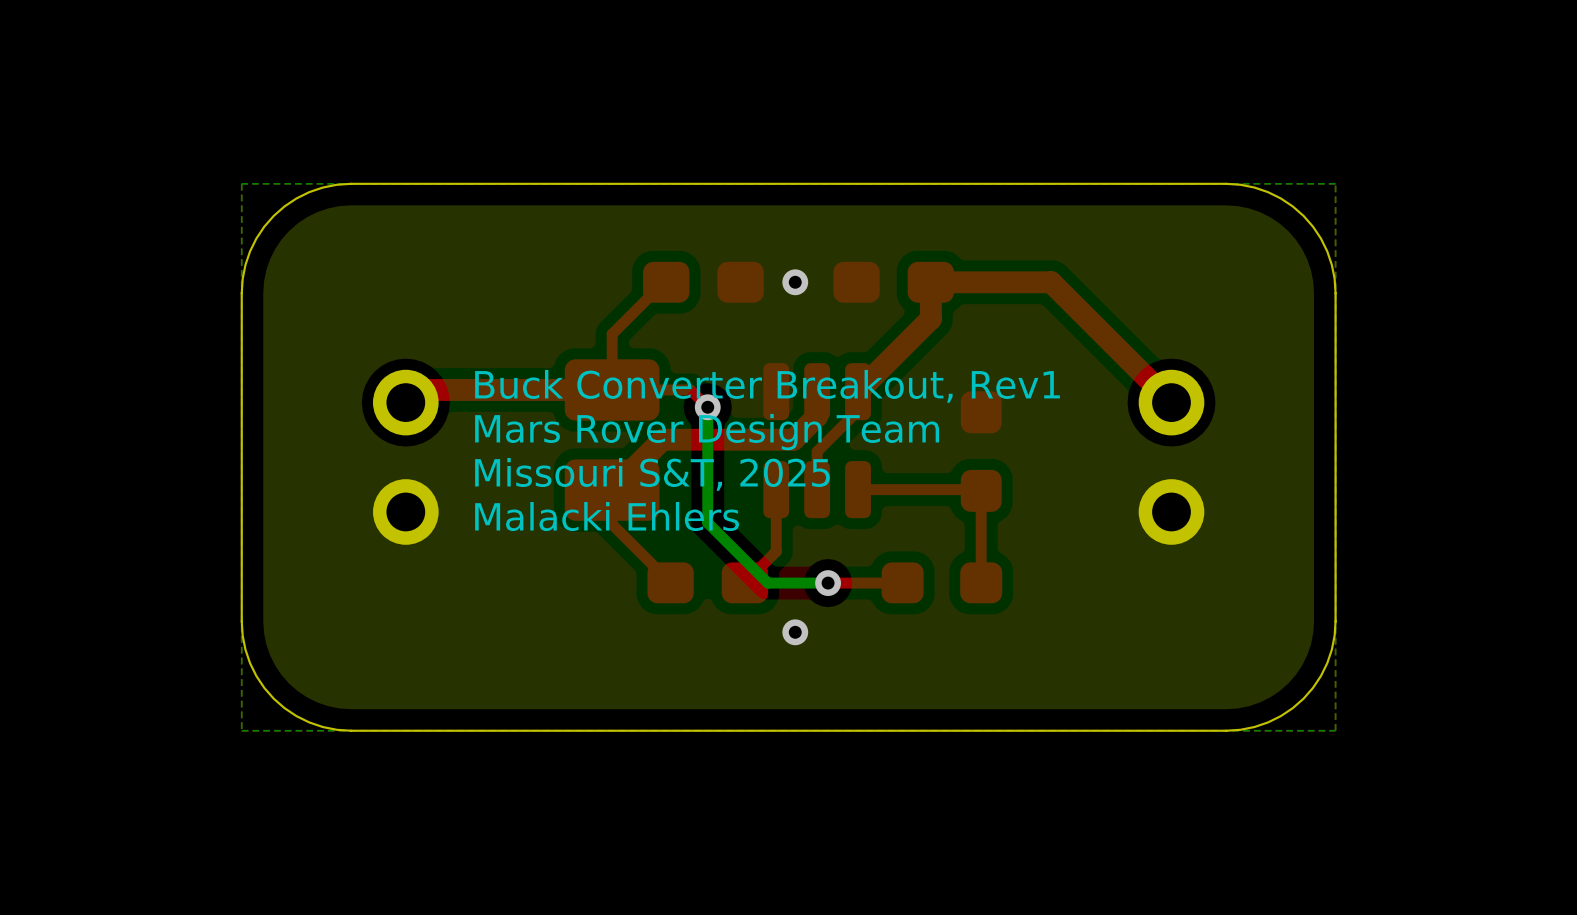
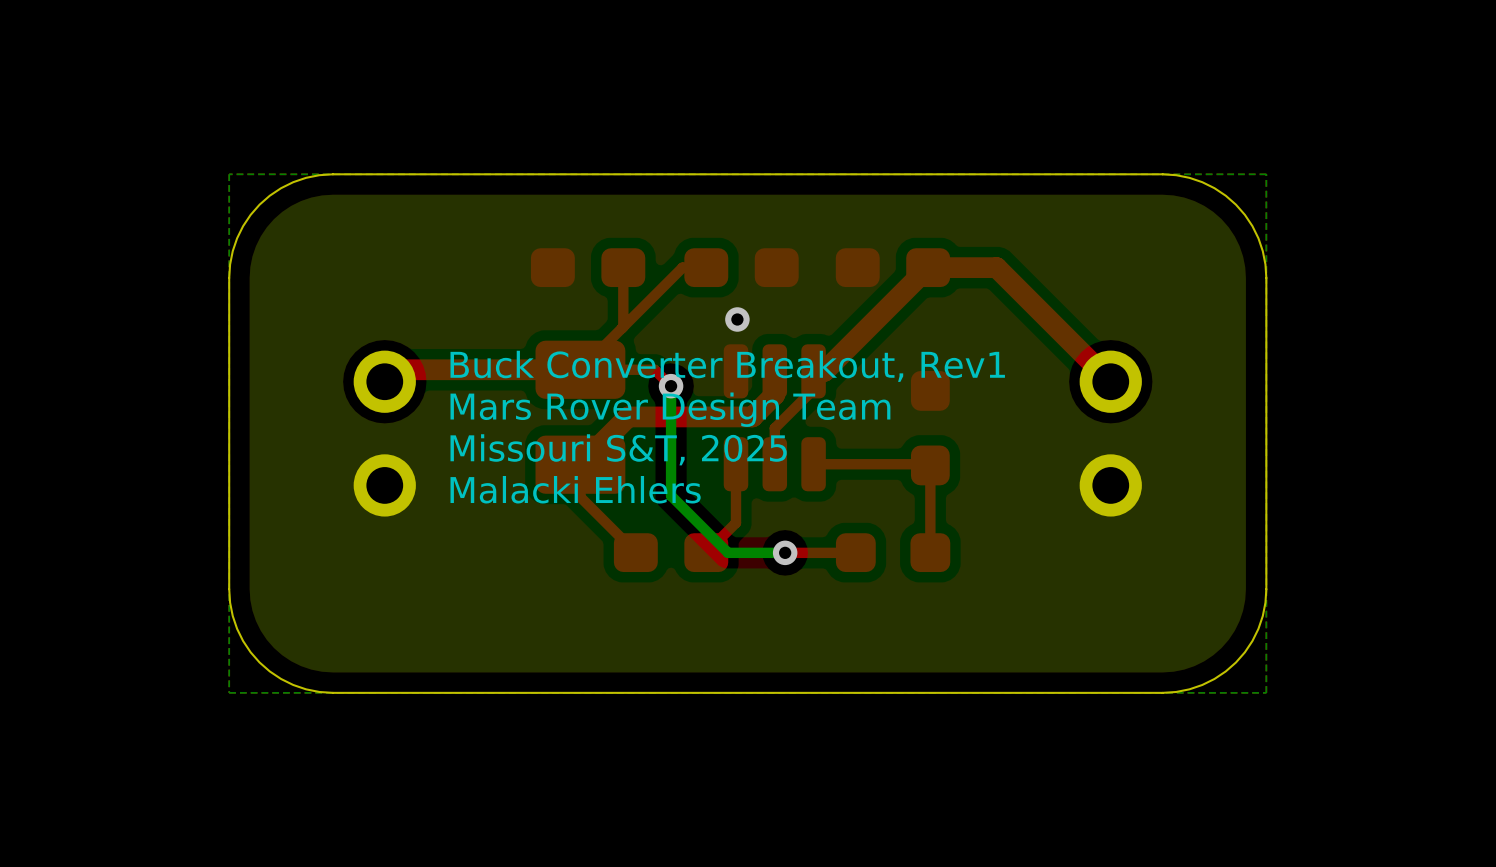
part: none -> (588, 267)
top track: none -> (623, 267) (623, 326)
top track: (666, 282) (664, 282) (612, 334) (612, 389) -> (706, 267) (682, 267) (580, 369)
part: (703, 282) -> none
part: none -> (741, 267)
via position: (795, 282) -> (737, 319)
part position: (893, 282) -> (892, 267)
top track: (978, 282) (930, 282) (930, 318) (858, 391) -> (928, 267) (824, 371) (813, 371)
via: (795, 632) -> none

